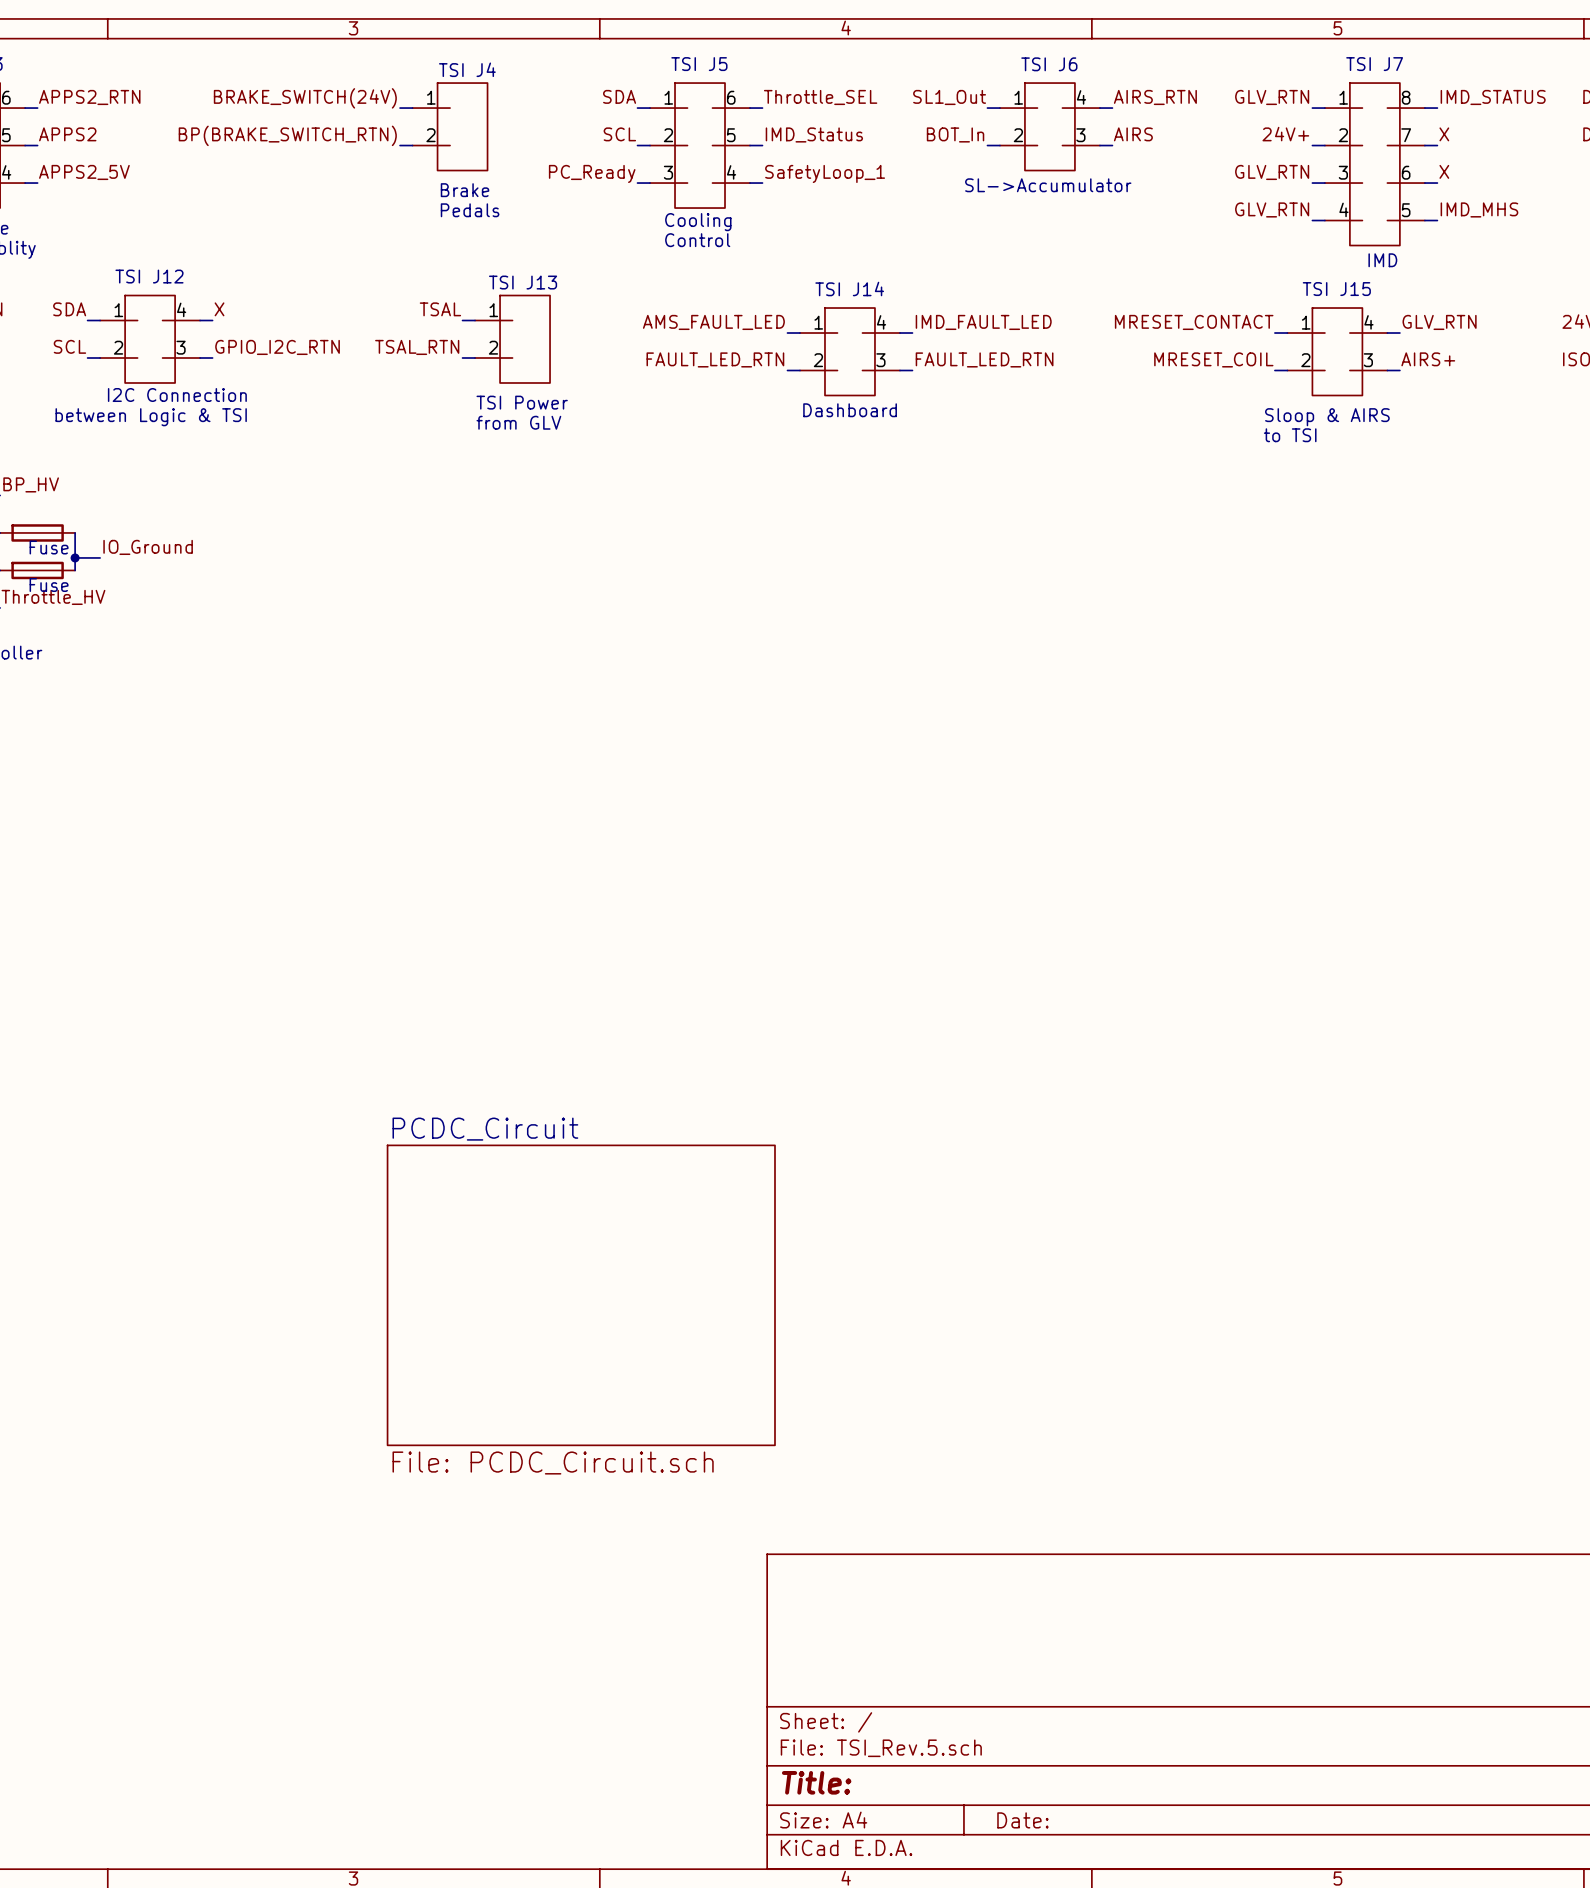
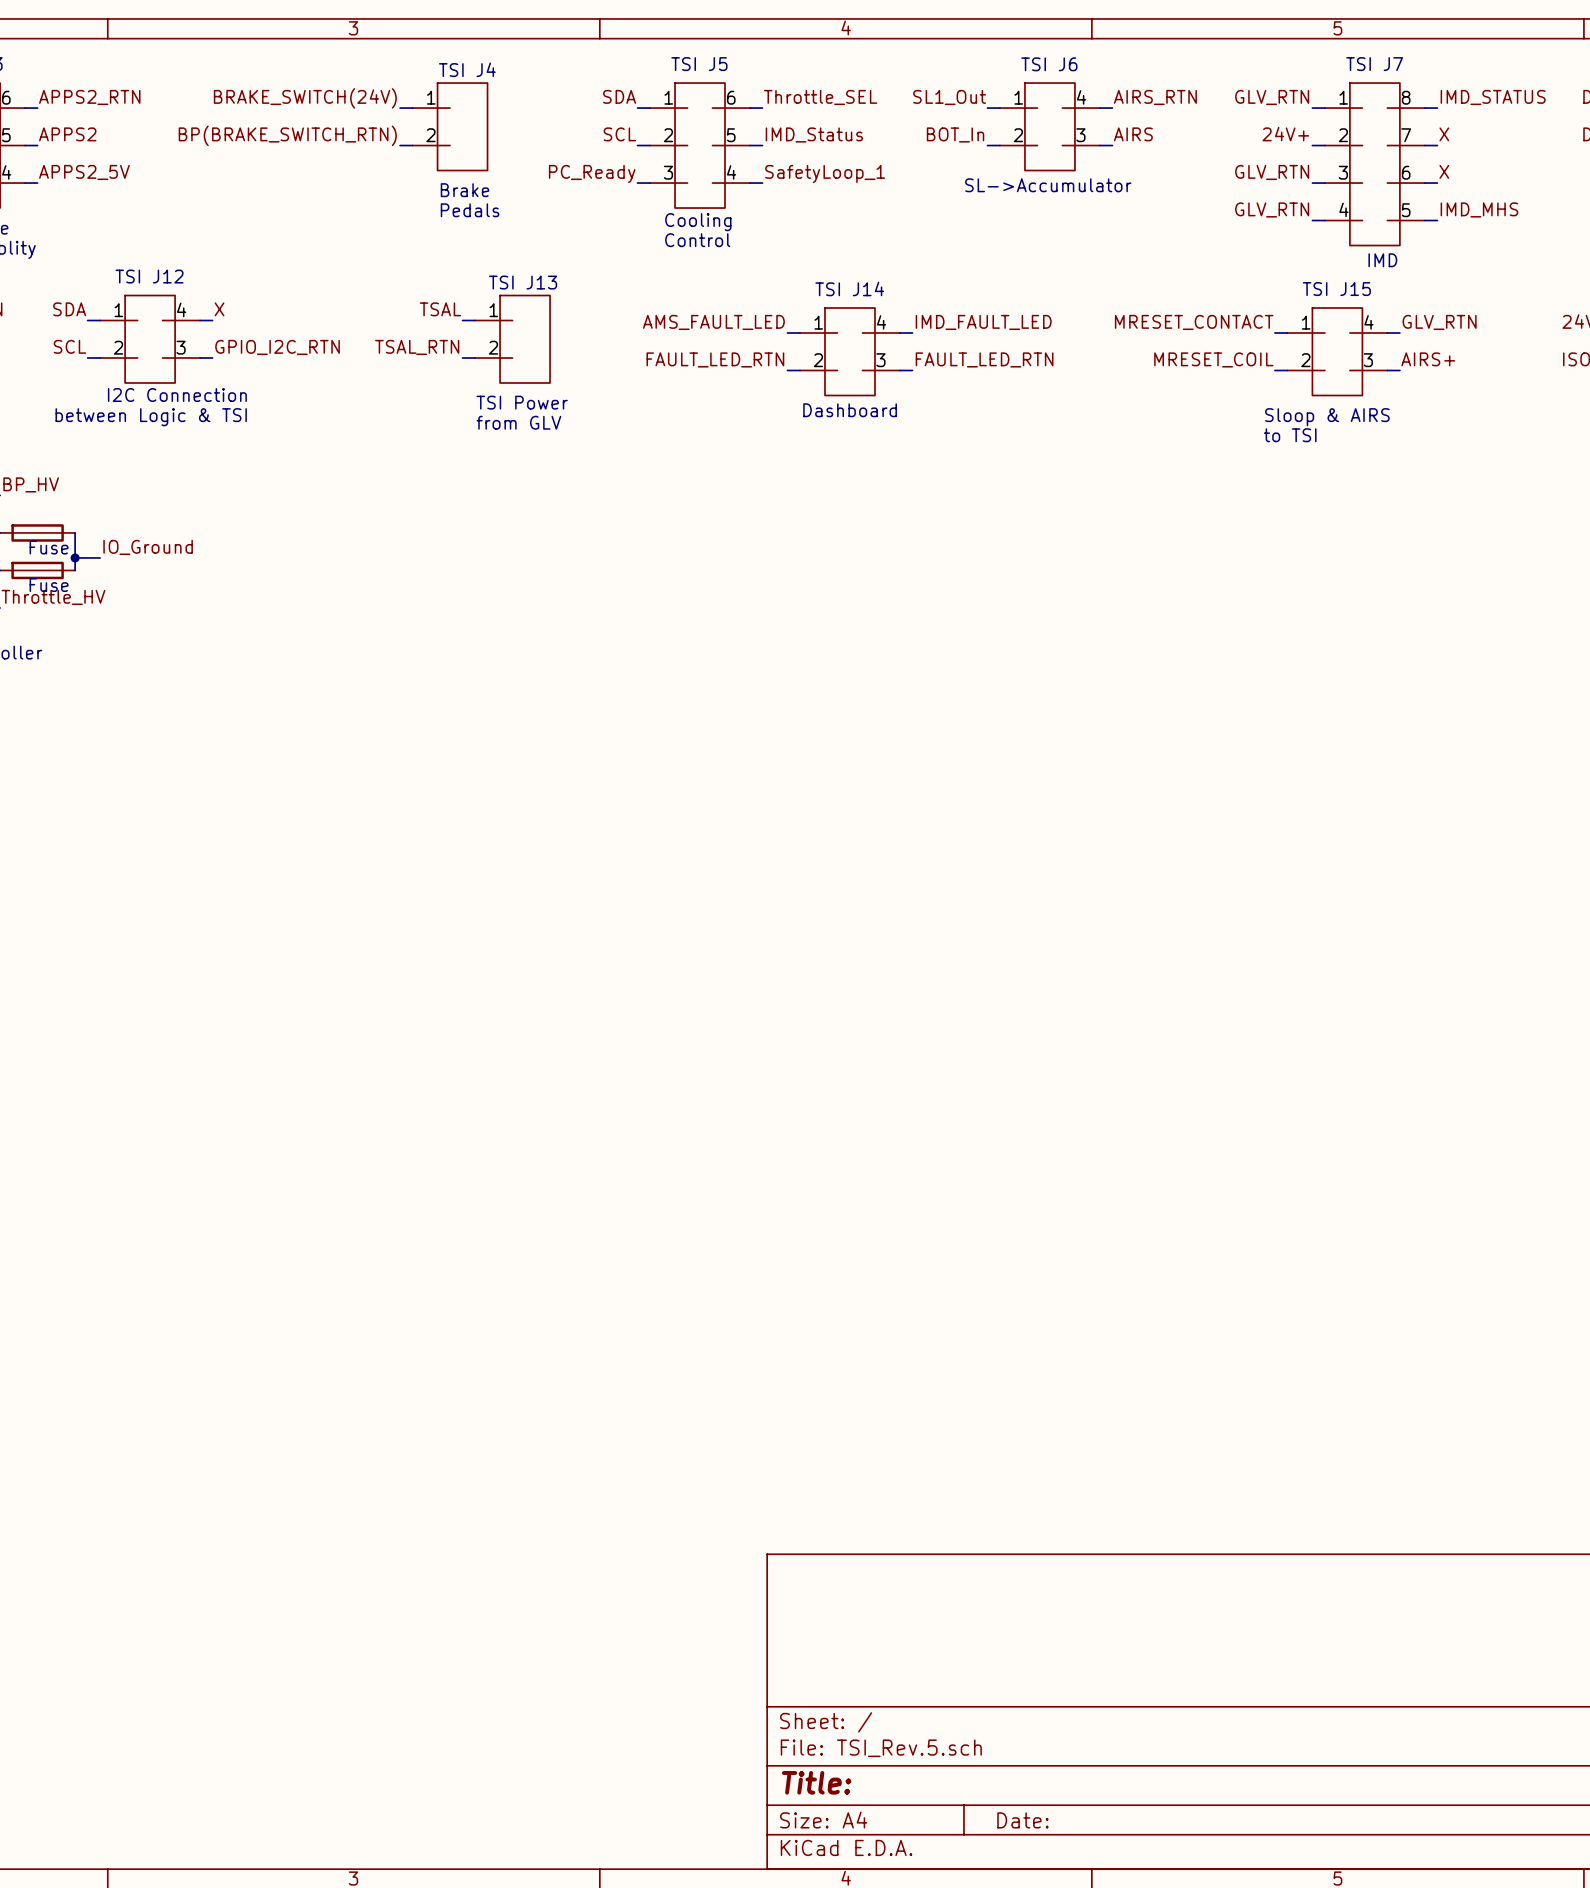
sheet PCDC_Circuit: File: PCDC_Circuit.sch (581, 1295) -> none

